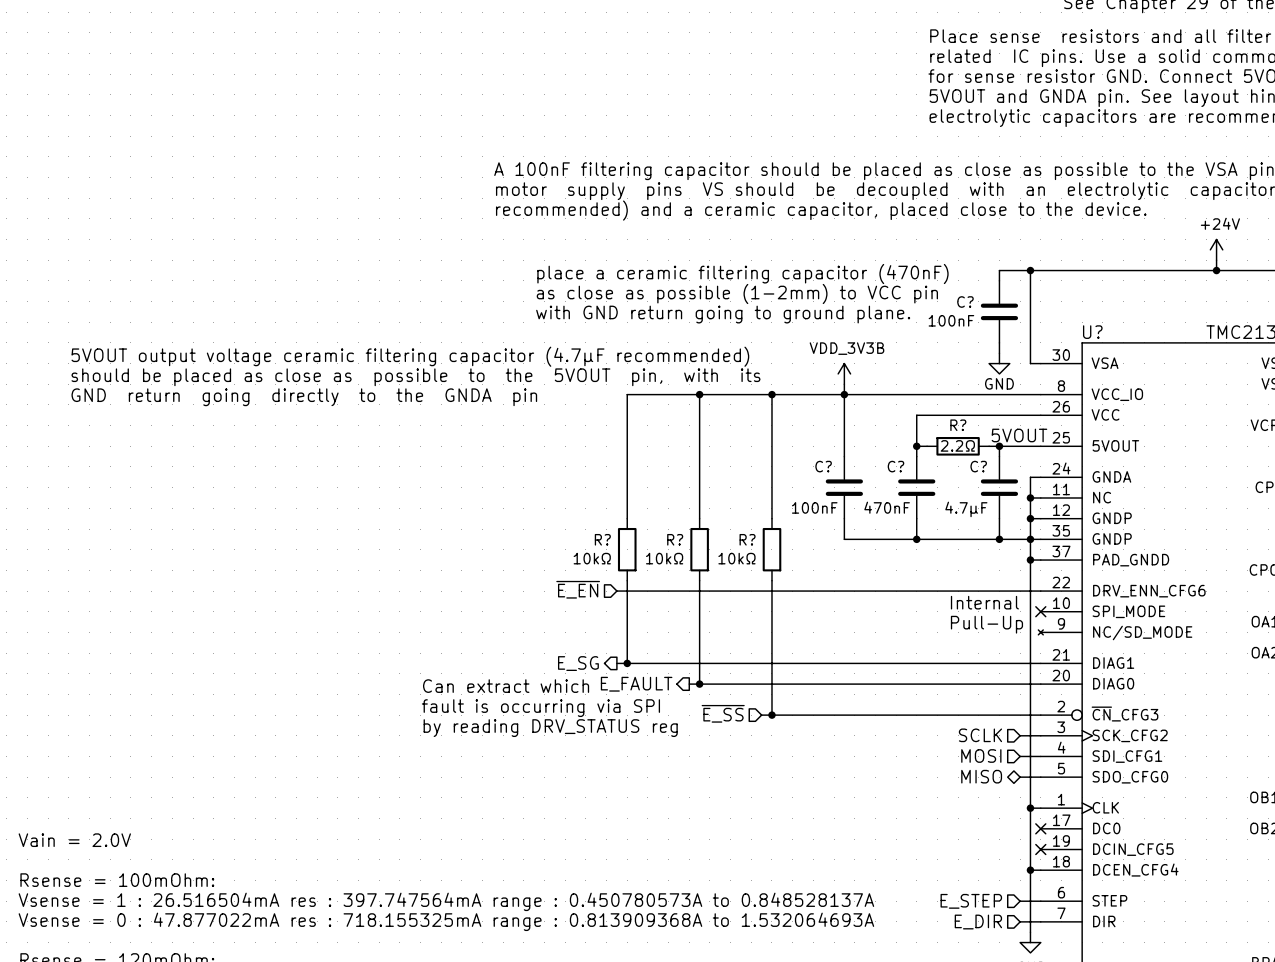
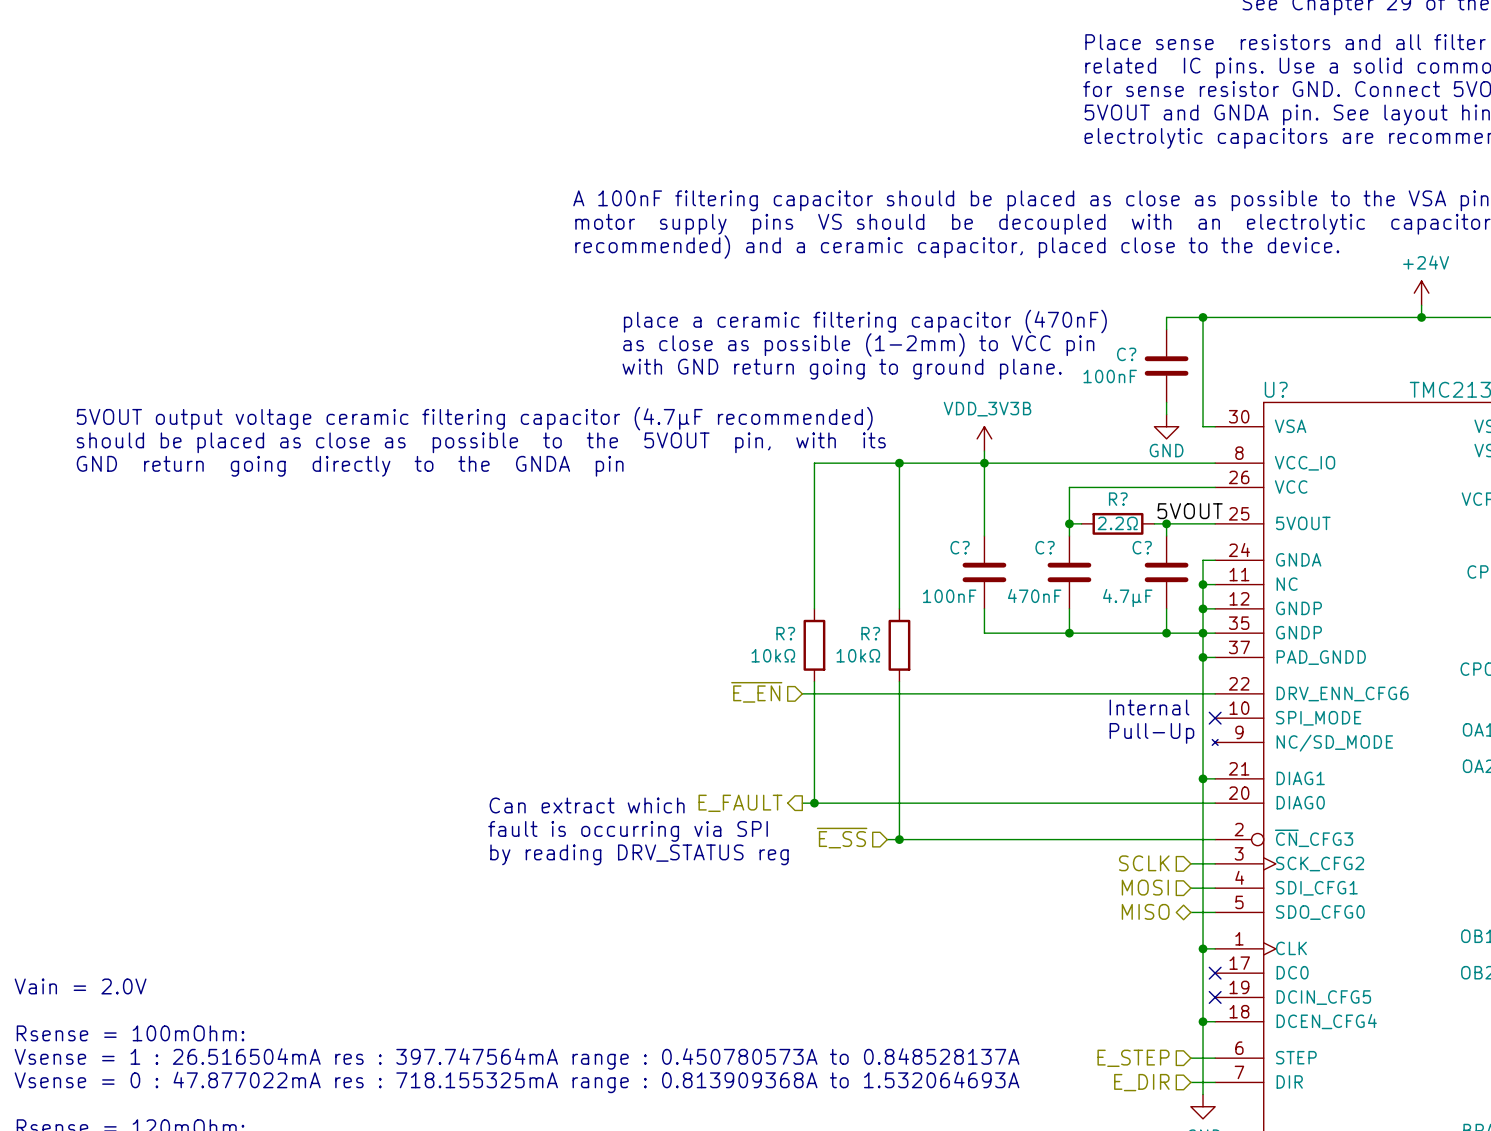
wire: (699, 394) (627, 394) (627, 518) -> none
junction: (699, 394) -> none
R?: 10kΩ (627, 549) -> none
wire: (627, 580) (627, 663) -> none
hierarchical label position: ~{E_EN} (578, 589) -> ~{E_EN} (756, 692)
wire: (616, 591) (689, 591) -> none
hierarchical label: E_SG (578, 663) -> none
wire: (616, 663) (1030, 663) -> none
junction: (627, 663) -> none
junction: none -> (1203, 778)

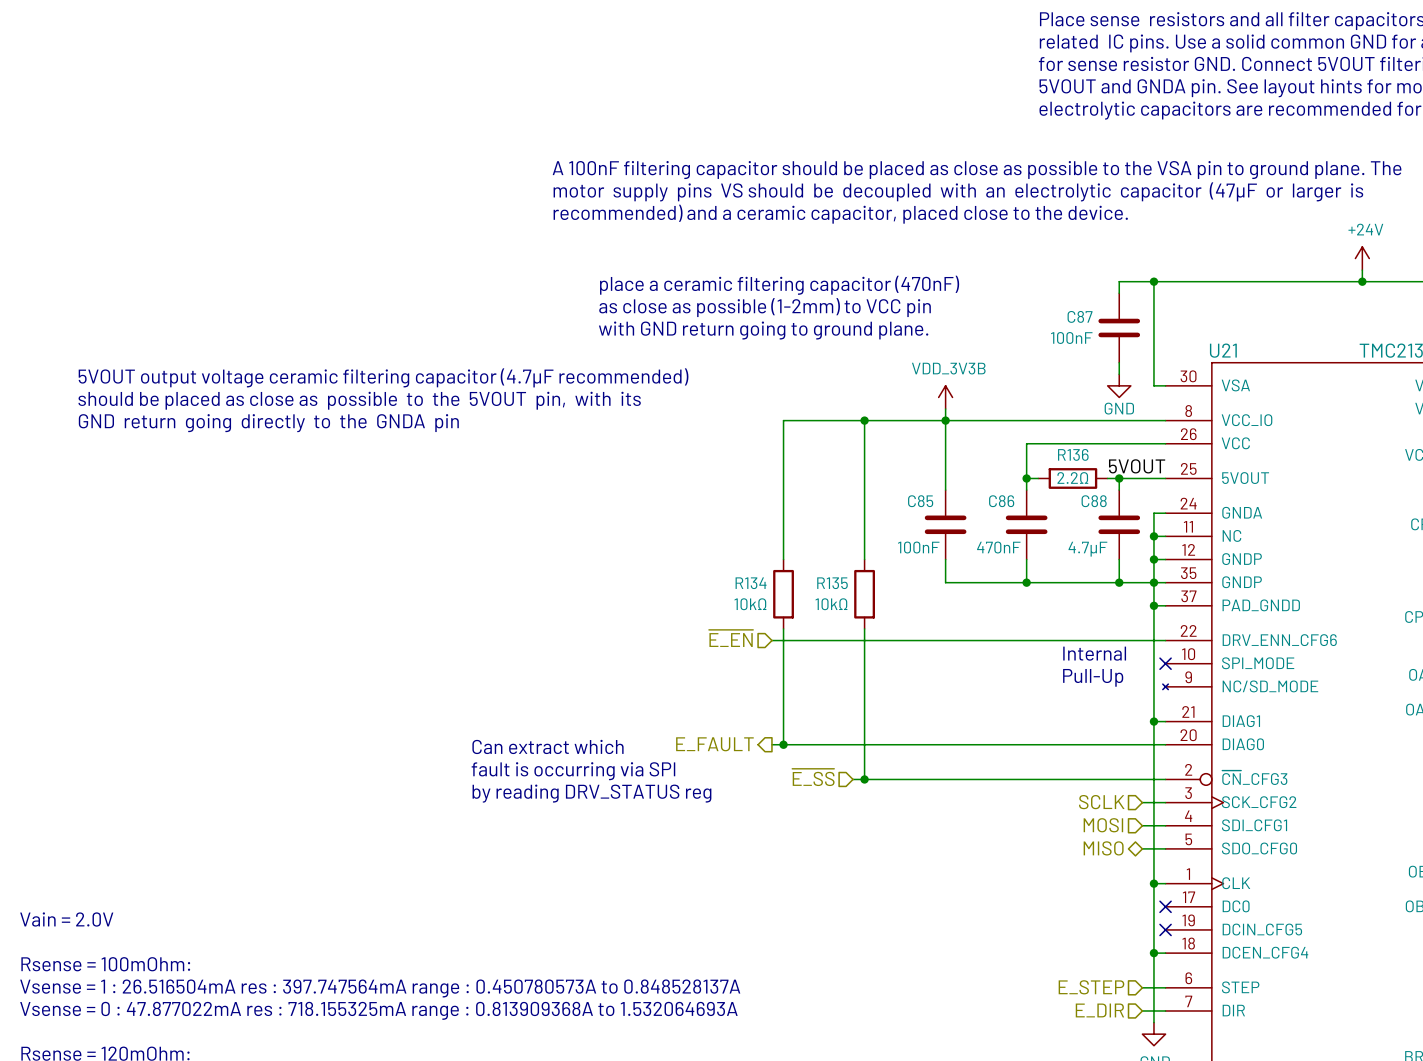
C? name: C? (1126, 354) -> C87 (1080, 316)
U? name: U? (1276, 389) -> U21 (1223, 350)
R? name: R? (1118, 499) -> R136 (1073, 454)
C? name: C? (960, 547) -> C85 (920, 501)
C? name: C? (1045, 547) -> C86 (1001, 501)
C? name: C? (1142, 547) -> C88 (1094, 501)
R? name: R? (785, 633) -> R134 (751, 583)
R? name: R? (870, 633) -> R135 (832, 583)

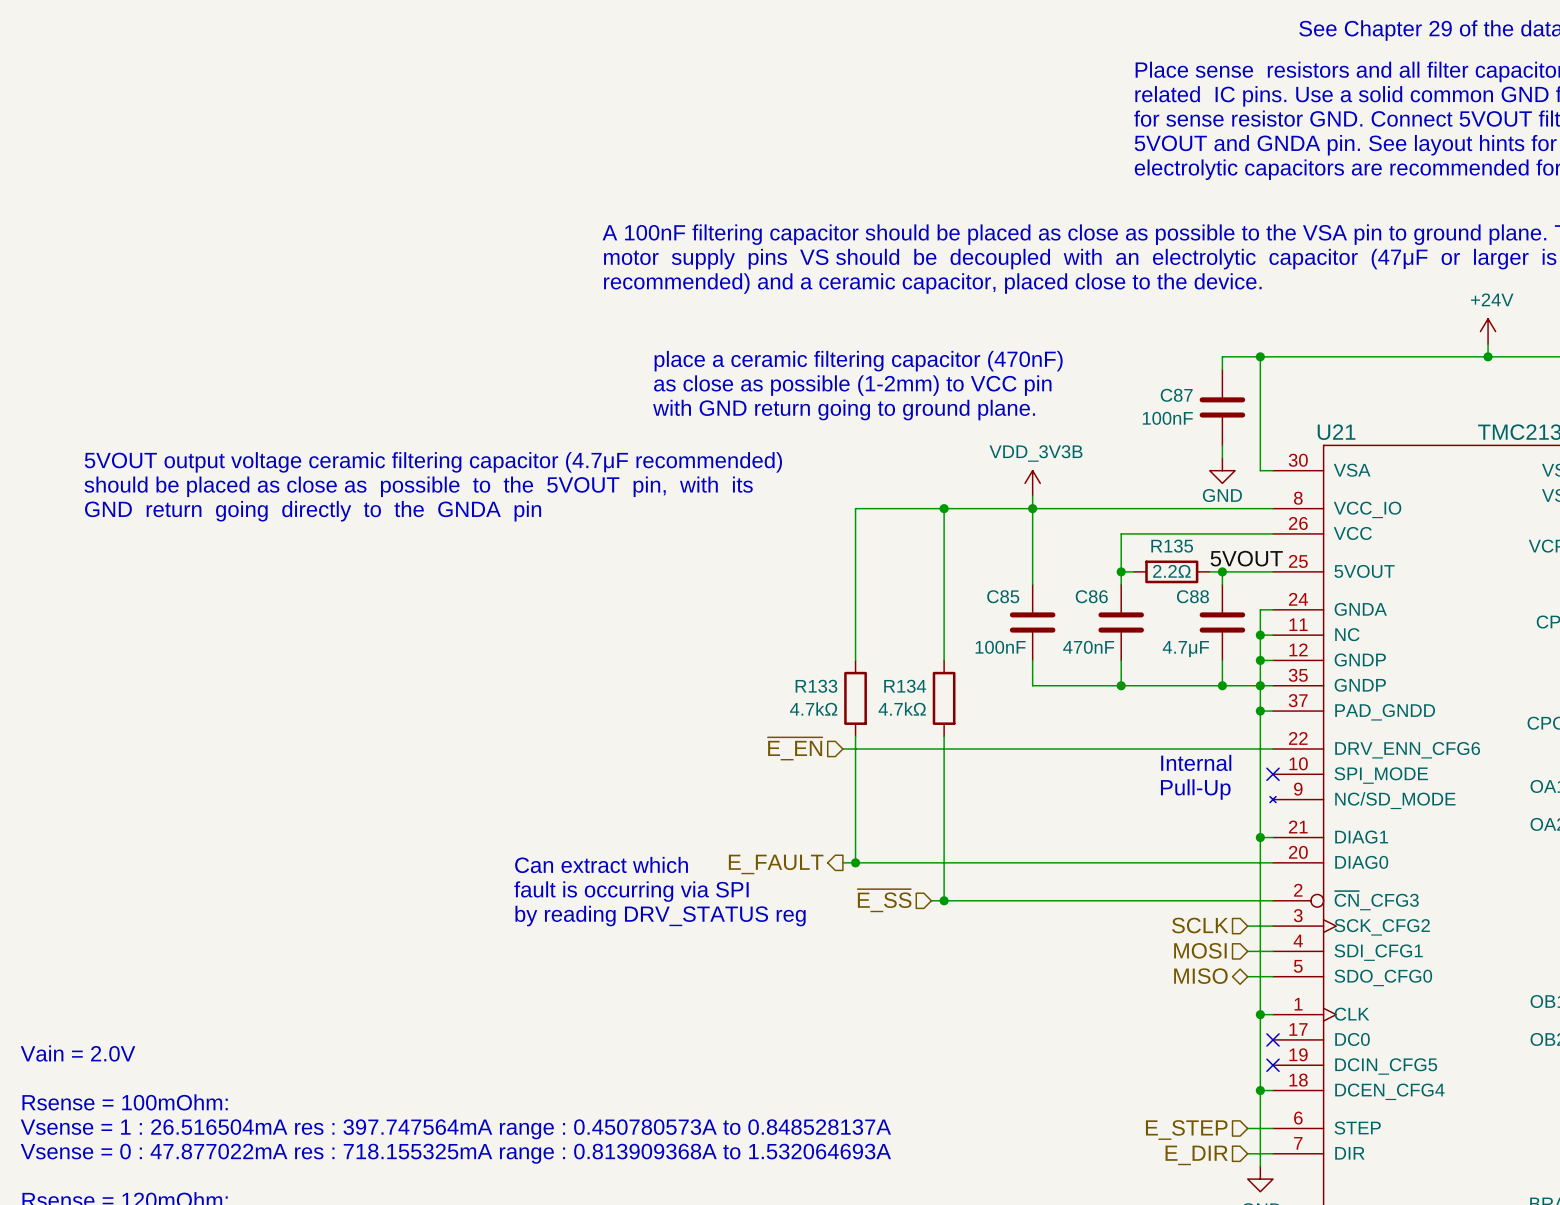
R136 name: R136 (1073, 454) -> R135 (1172, 546)
R134 name: R134 (751, 583) -> R133 (816, 686)
R135 name: R135 (832, 583) -> R134 (905, 686)
R134 value: 10kΩ (750, 604) -> 4.7kΩ (813, 708)
R135 value: 10kΩ (831, 604) -> 4.7kΩ (902, 708)

